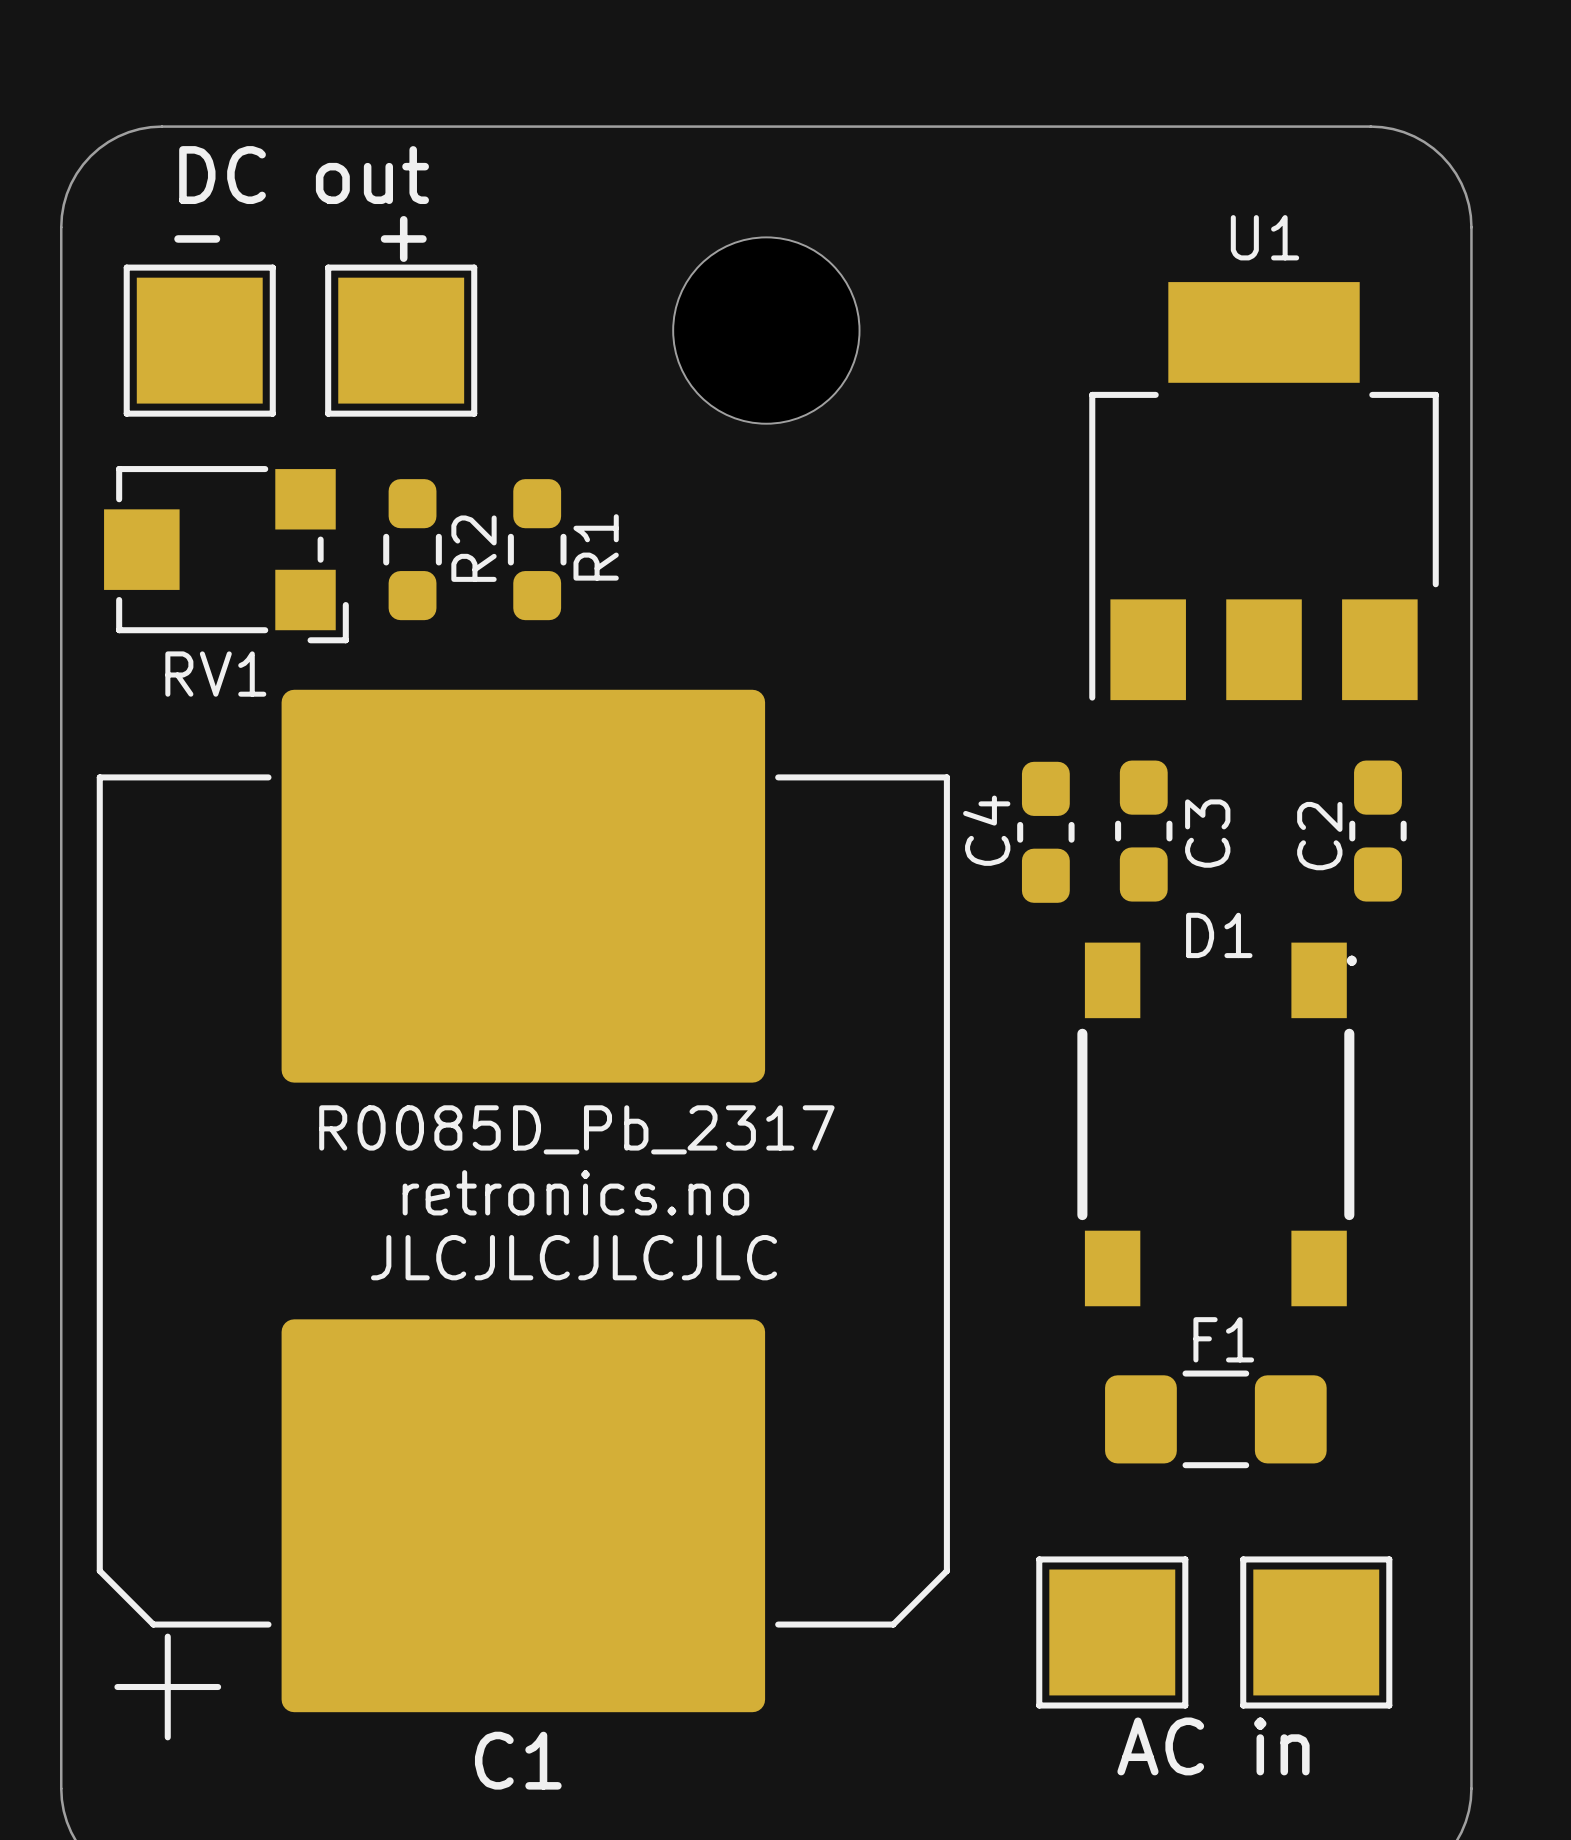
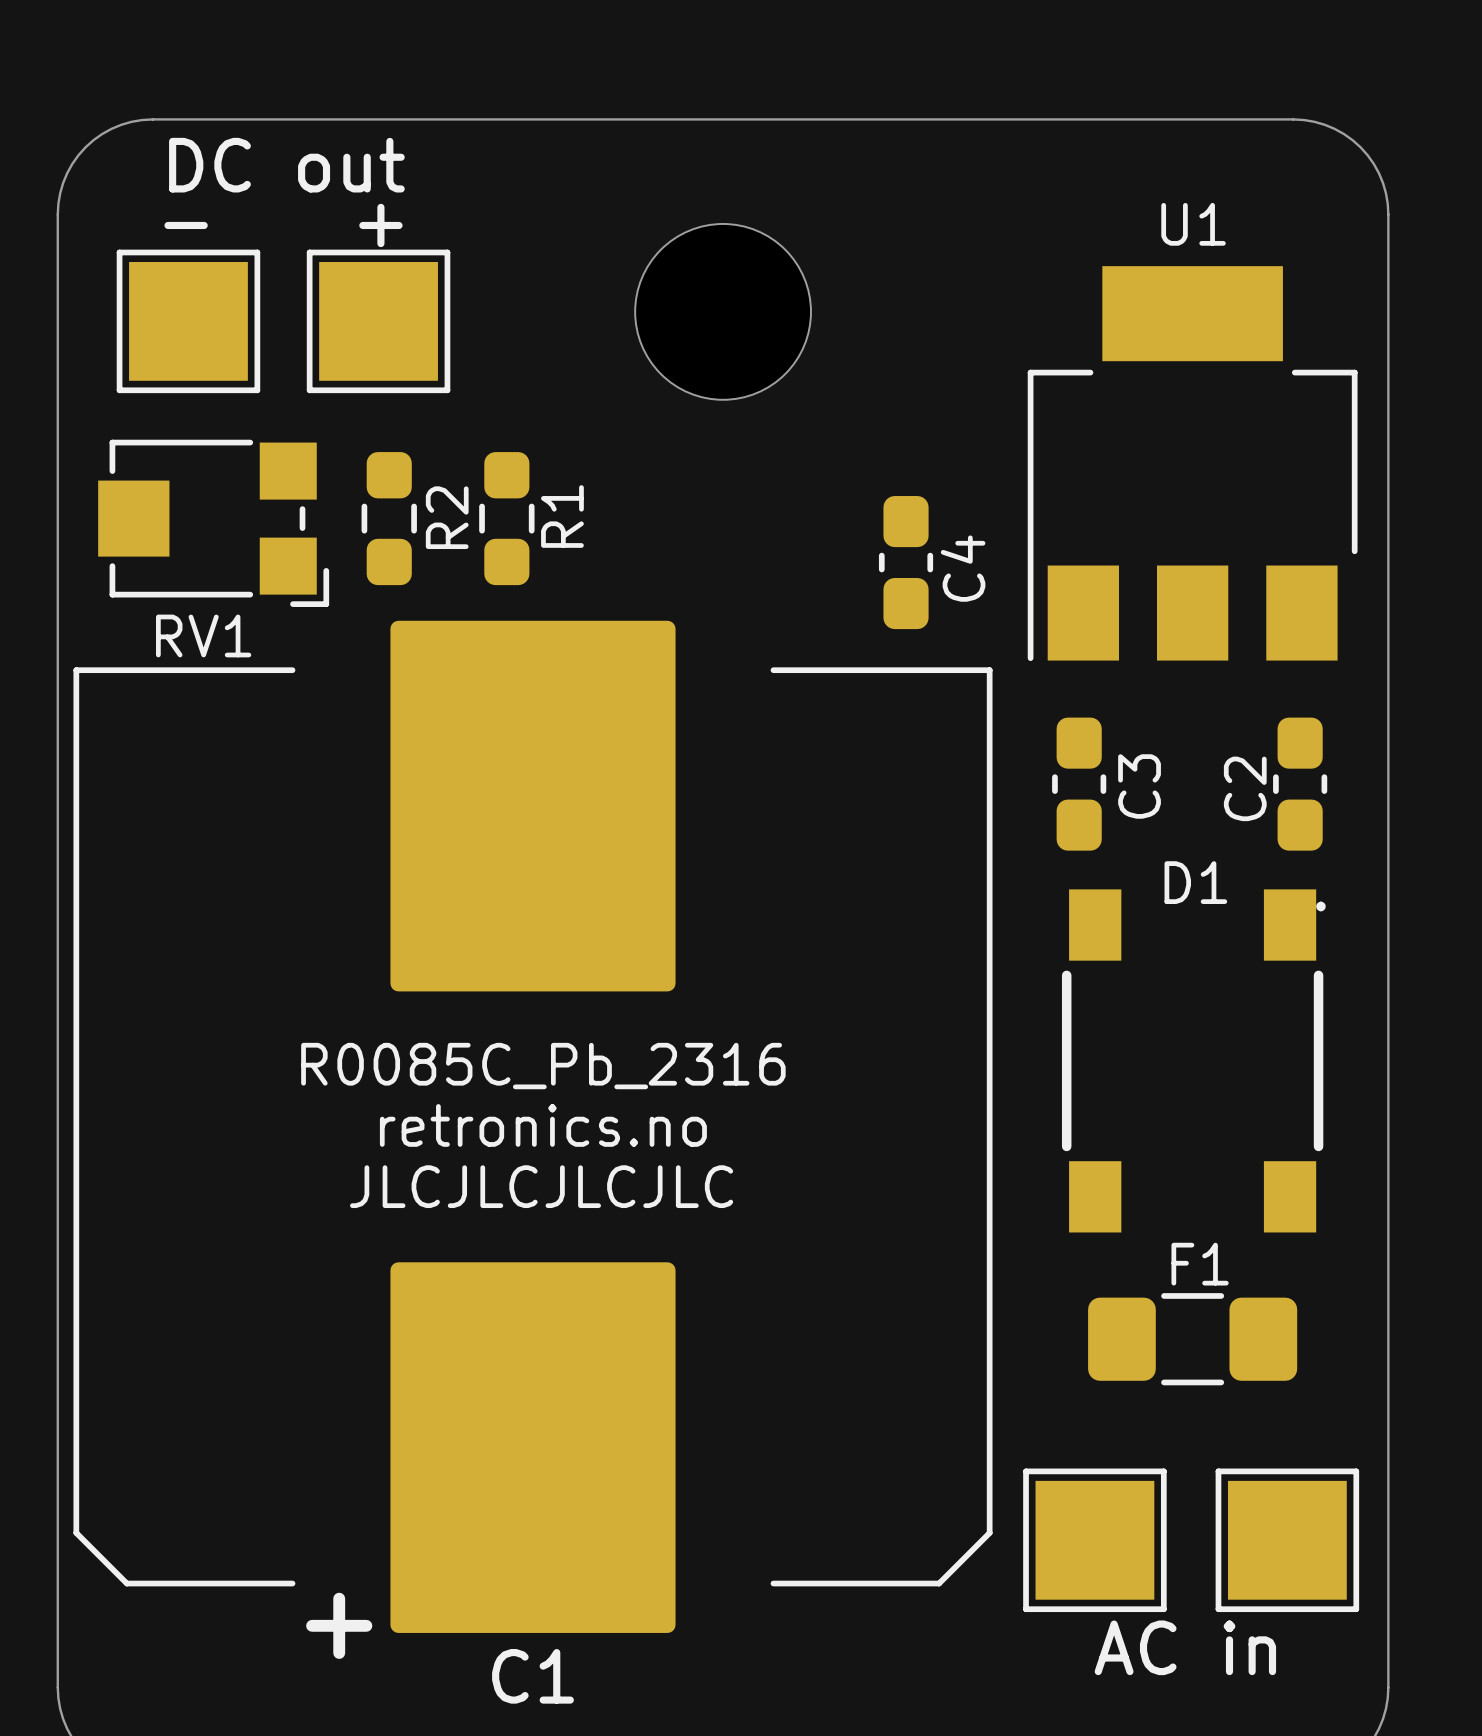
C1 footprint: [96, 689, 950, 1741] -> [73, 620, 993, 1633]
C4 name position: C4 (986, 830) -> C4 (963, 568)
C4 position: (1045, 832) -> (906, 562)
D1 position: (1217, 1124) -> (1193, 1060)
text: R0085D_Pb_2317 (576, 1129) -> R0085C_Pb_2316 (543, 1066)
F1 position: (1215, 1419) -> (1192, 1339)
part position: (1112, 1632) -> (1094, 1540)
part position: (1316, 1632) -> (1287, 1540)
text position: AC in (1213, 1746) -> AC in (1185, 1647)

